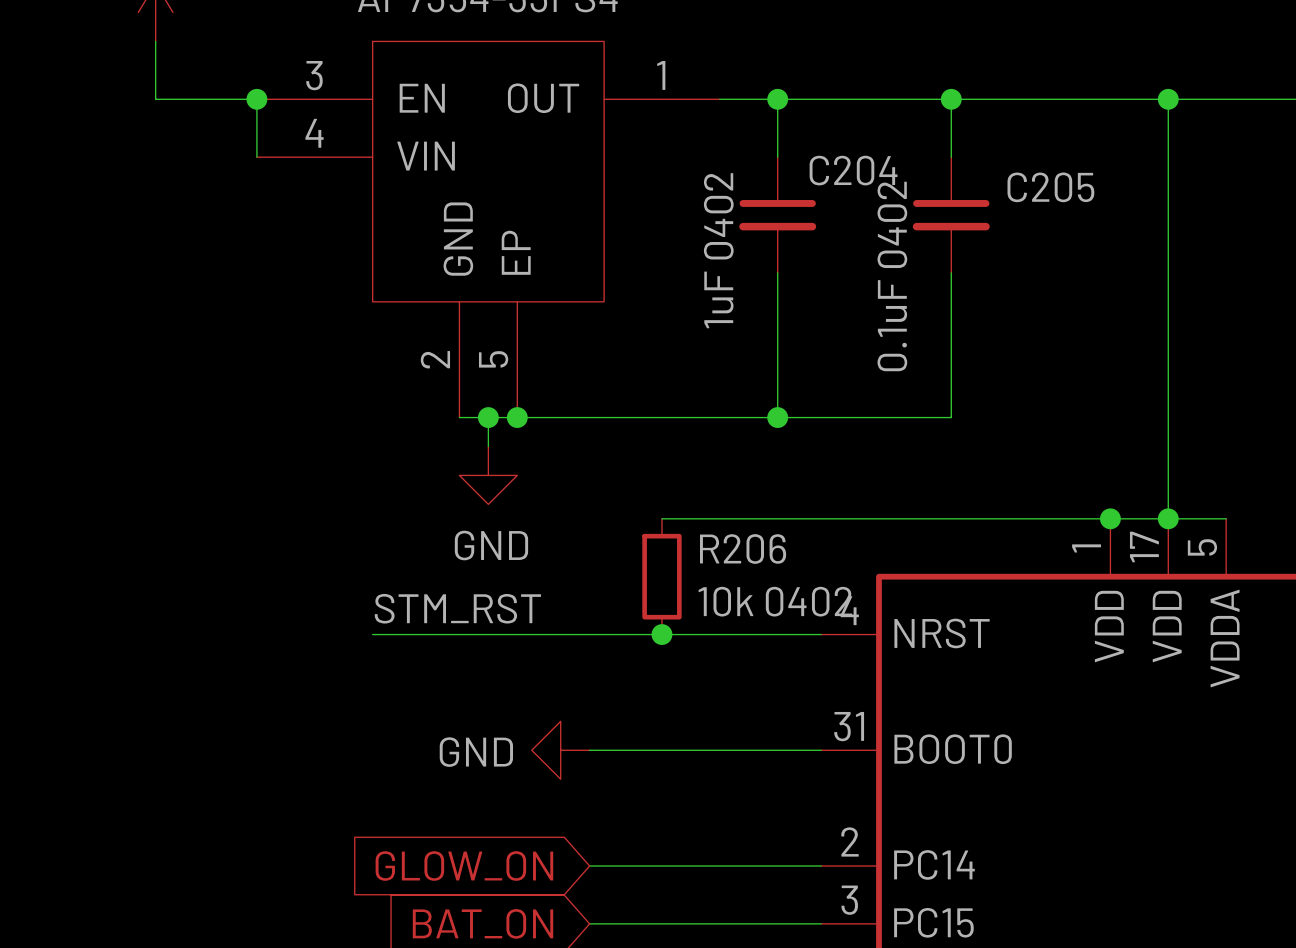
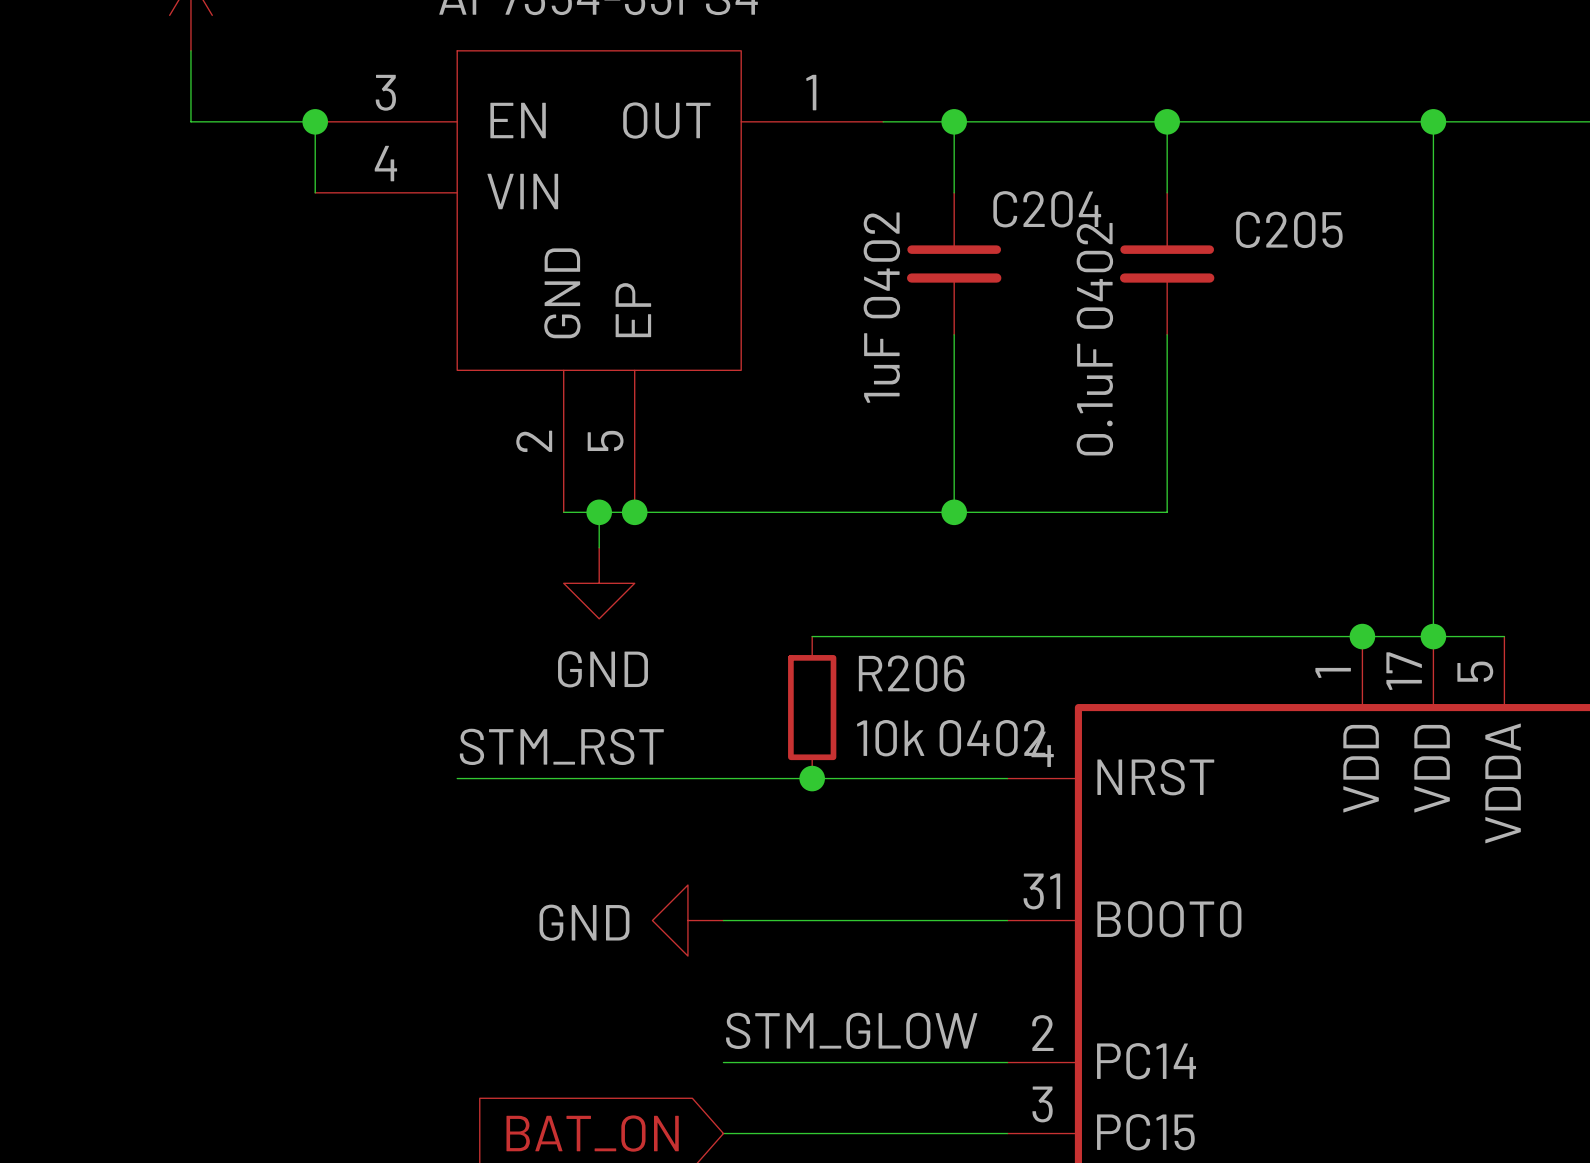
label: none -> STM_GLOW (851, 1030)
global label: GLOW_ON (464, 866) -> none

